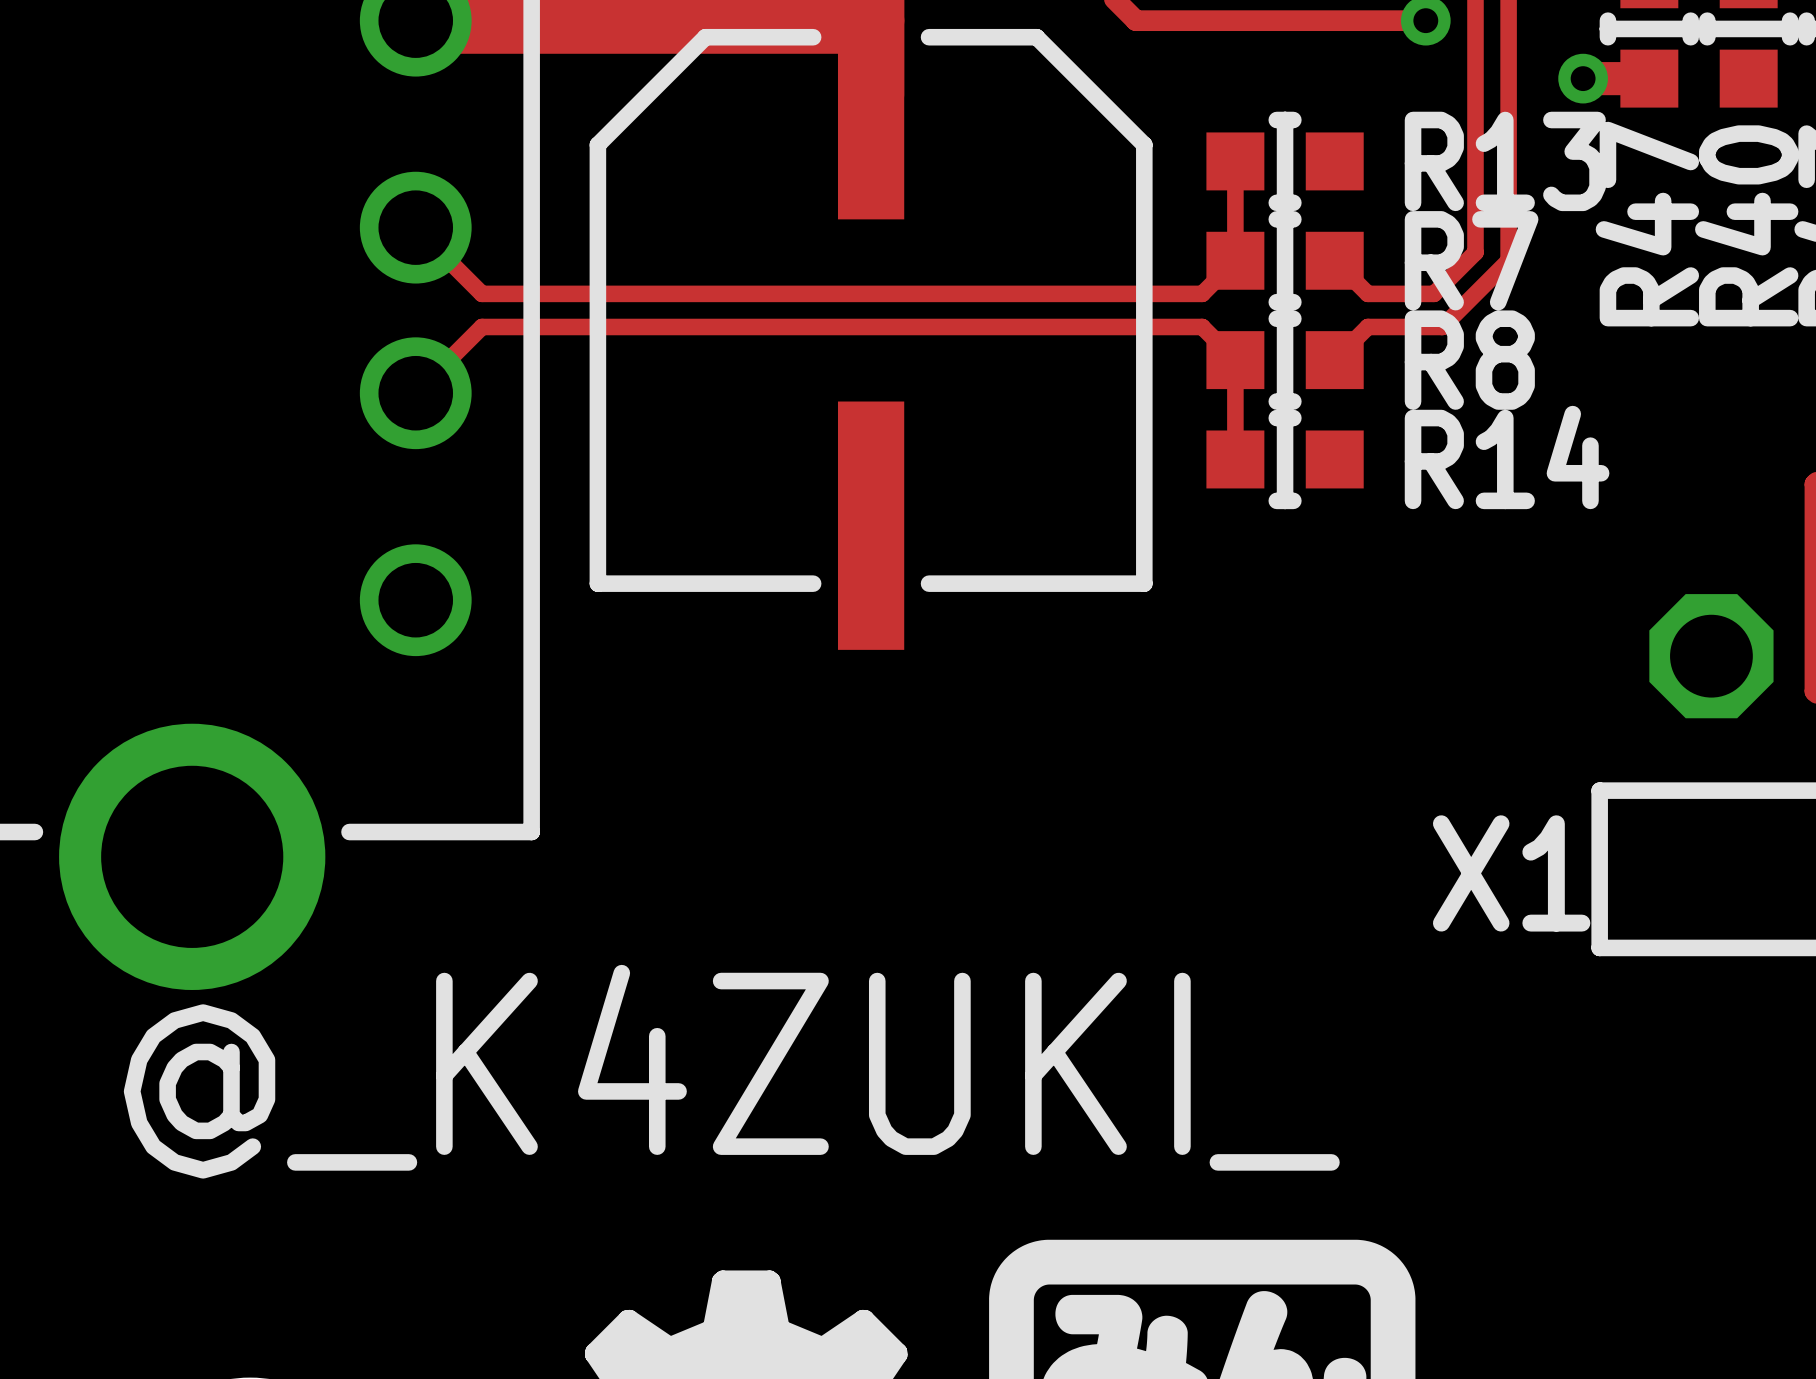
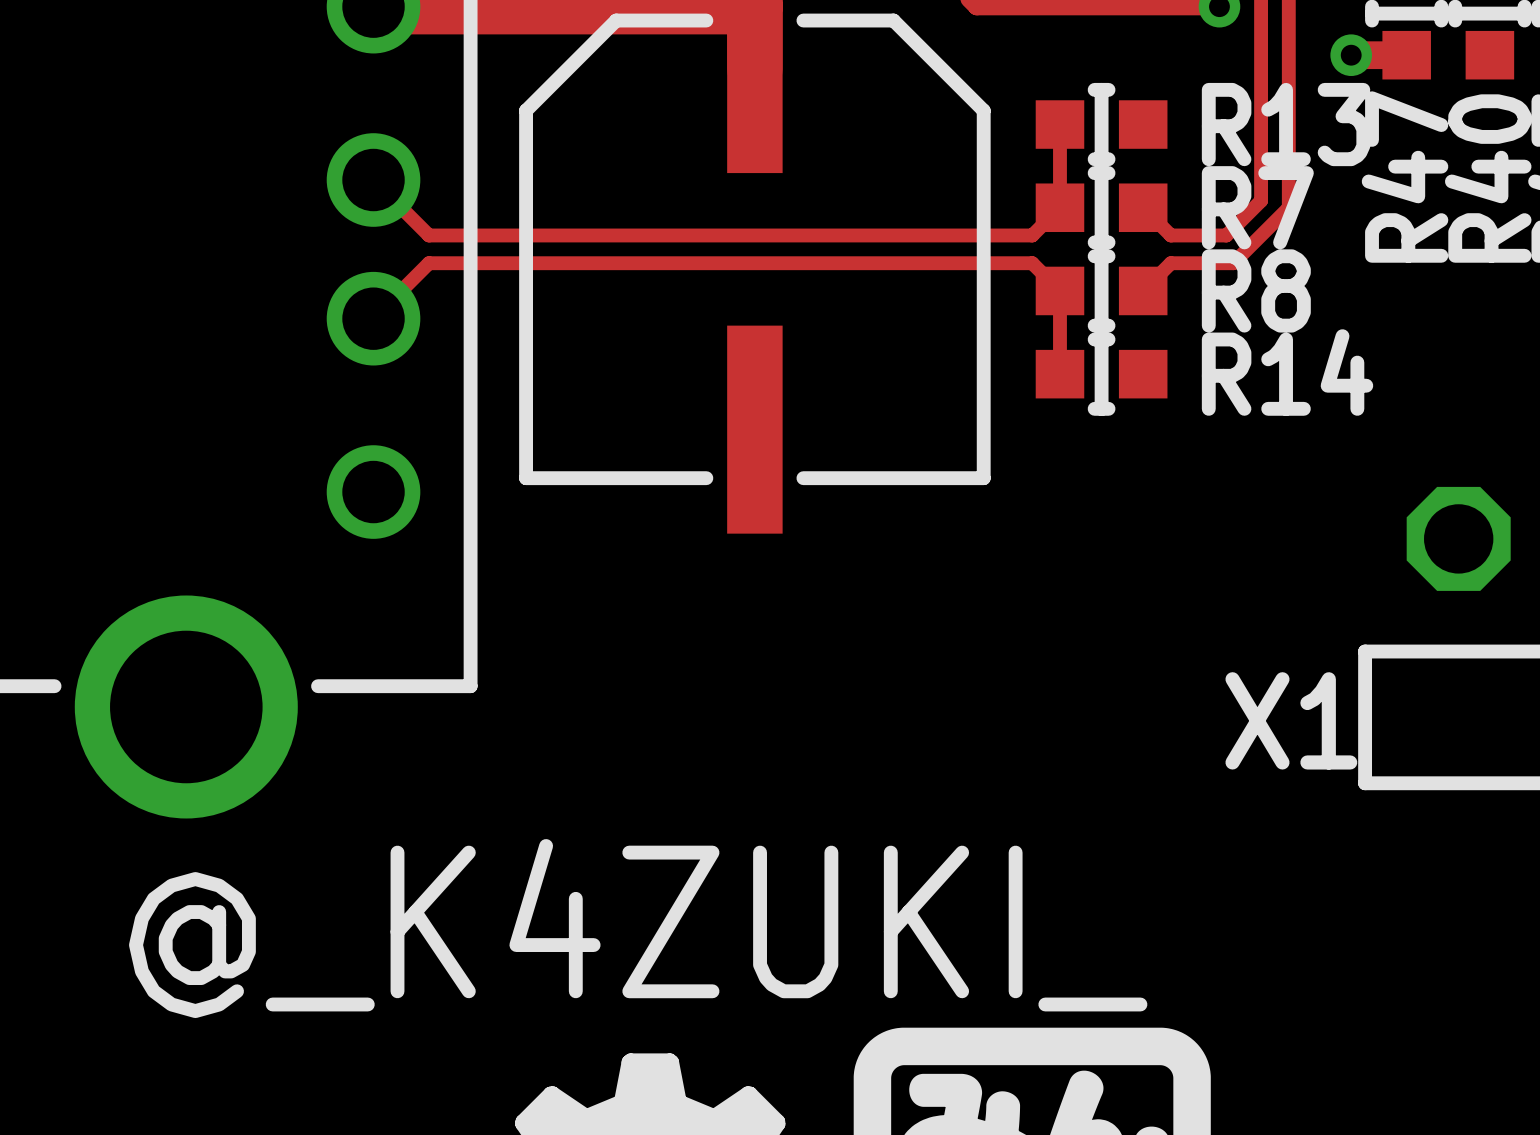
text position: @_K4ZUKI_ (731, 1071) -> @_K4ZUKI_ (638, 928)

